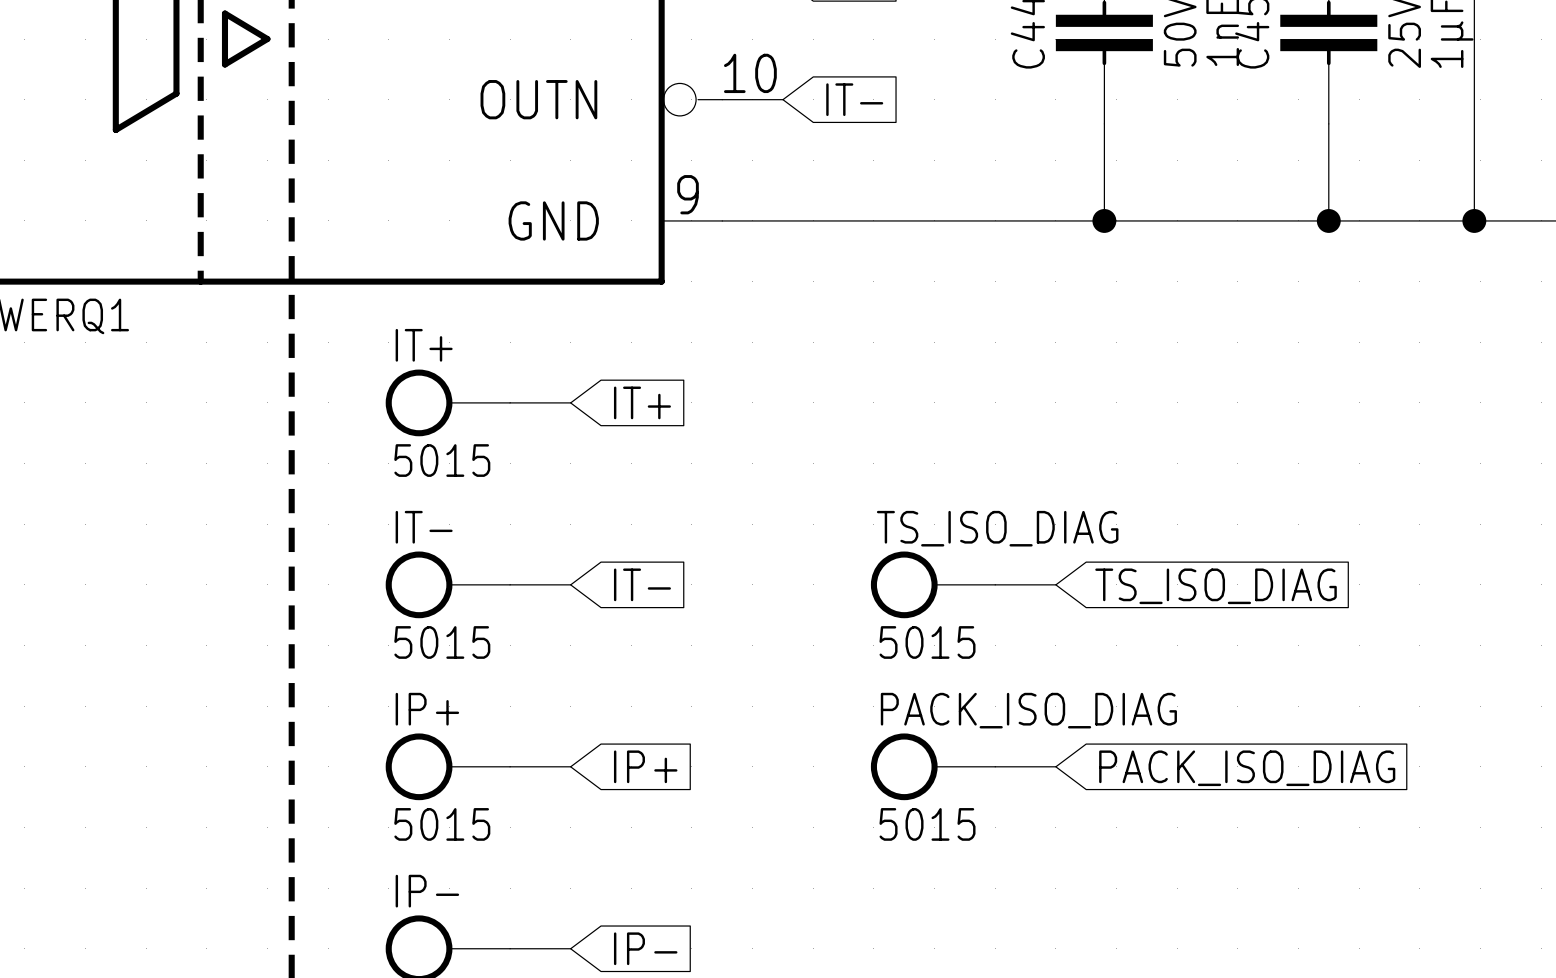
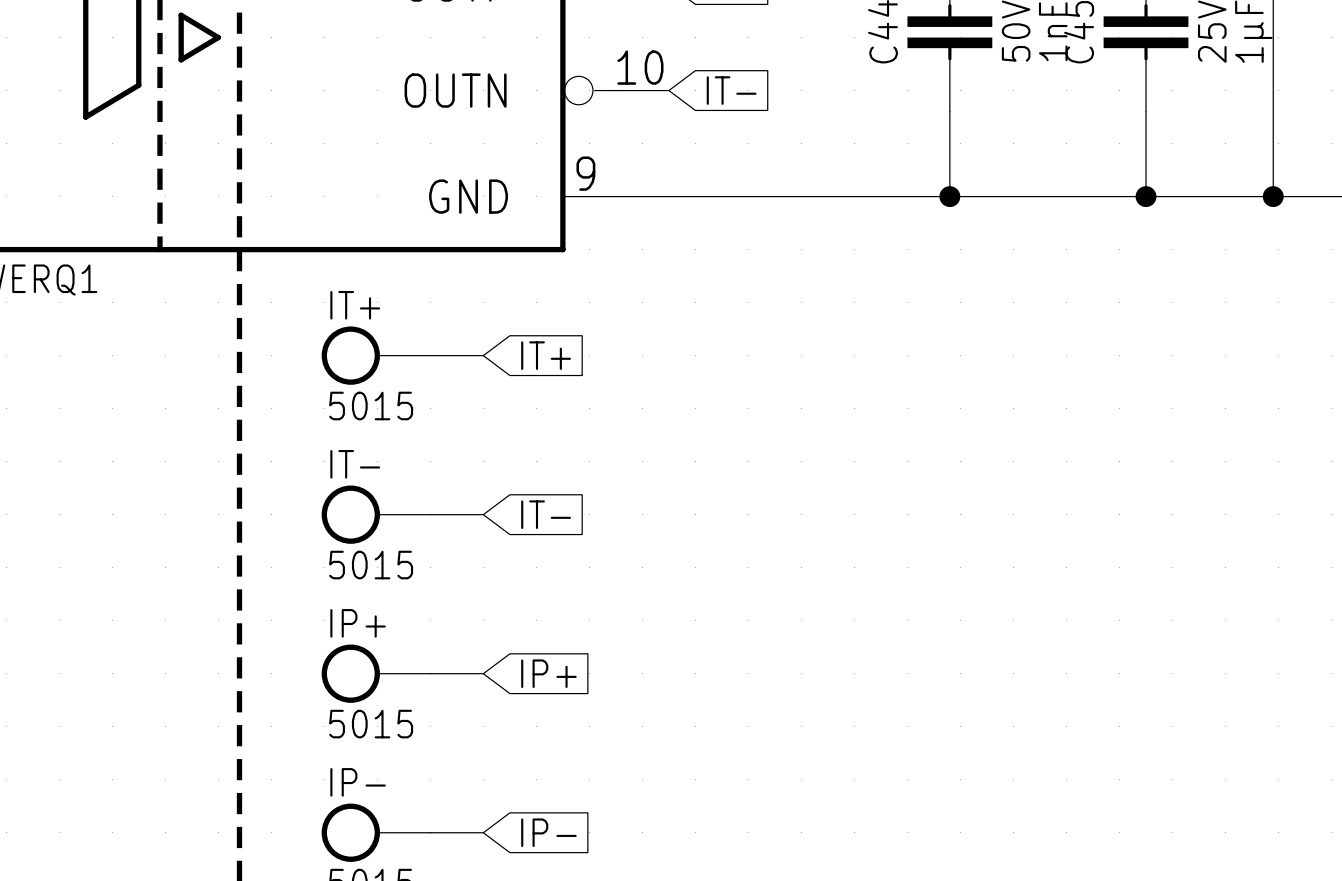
TS_ISO_DIAG: (933, 584) -> none
wire: (995, 584) (1055, 584) -> none
global label: TS_ISO_DIAG (1216, 586) -> none
PACK_ISO_DIAG: (933, 766) -> none
wire: (995, 766) (1055, 766) -> none
global label: PACK_ISO_DIAG (1247, 768) -> none

